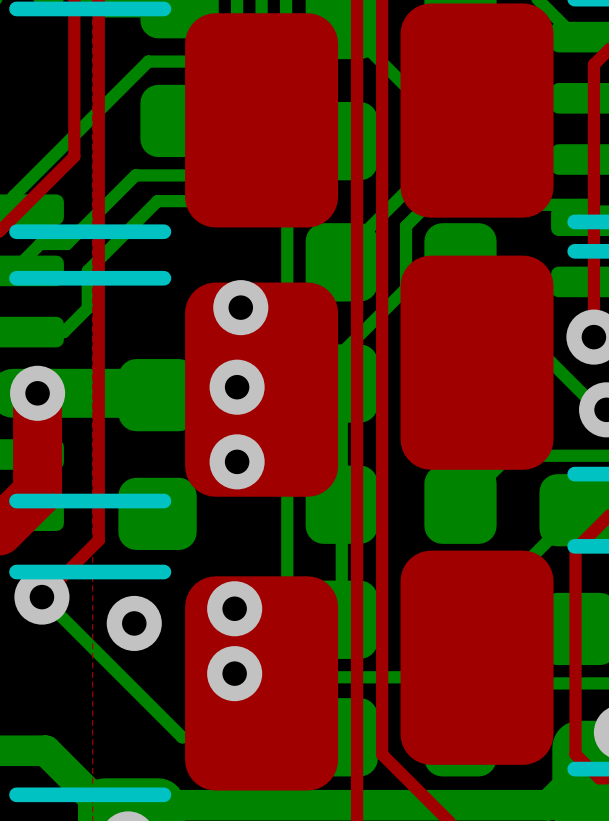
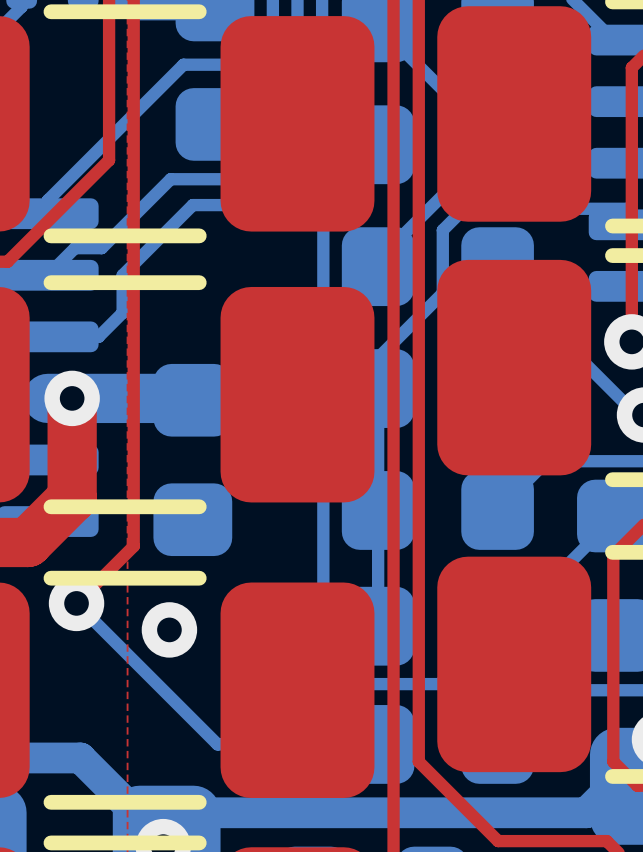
via: (240, 307) -> none
via: (237, 387) -> none
via: (237, 461) -> none
via: (234, 608) -> none
via: (234, 673) -> none

